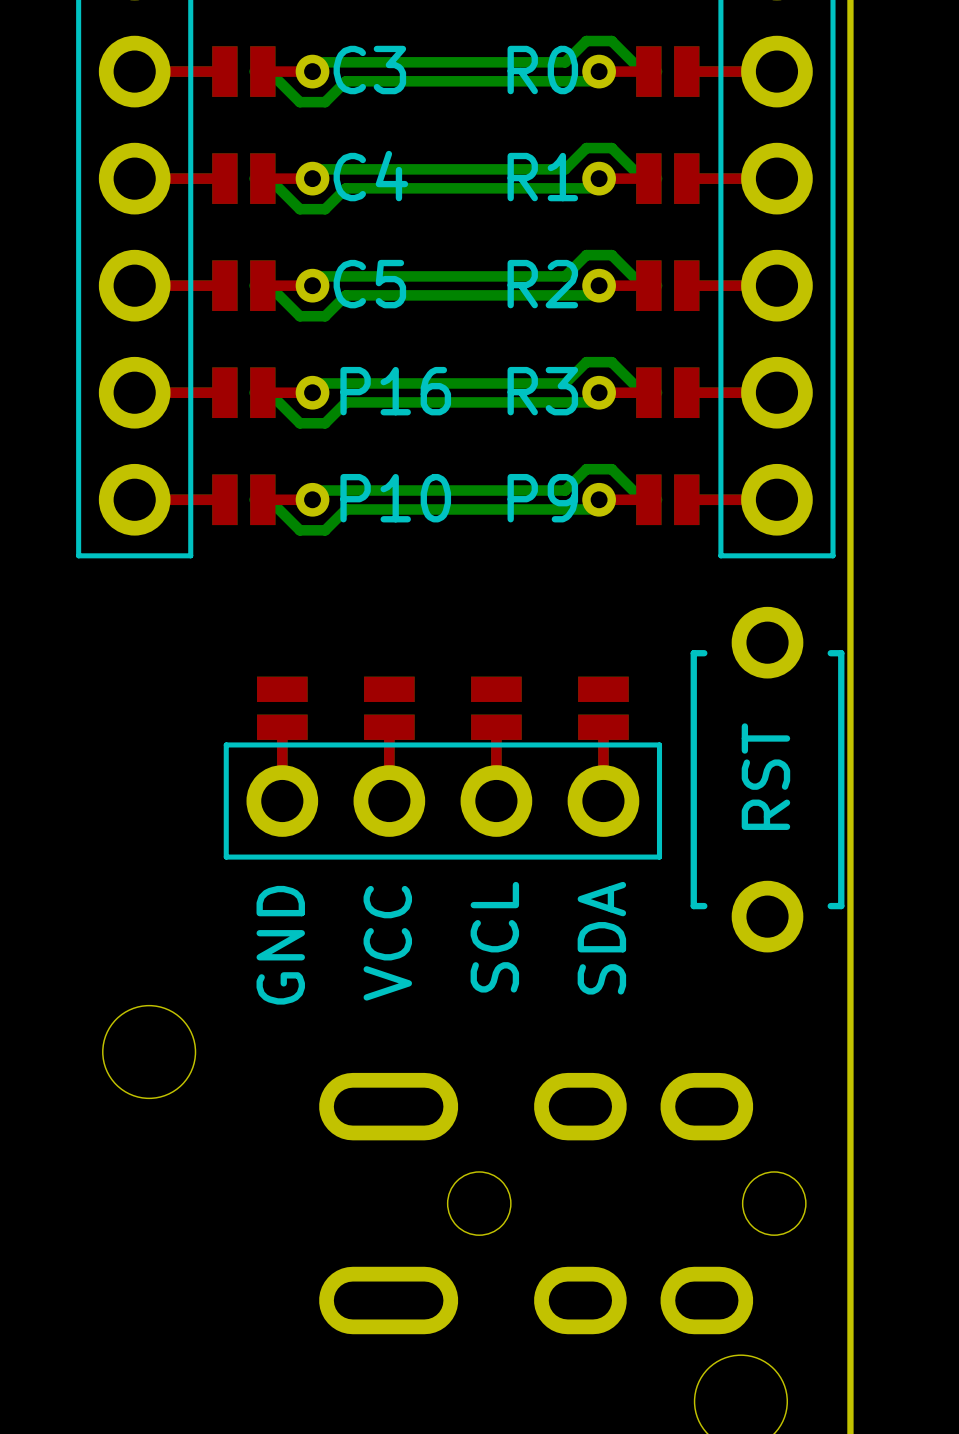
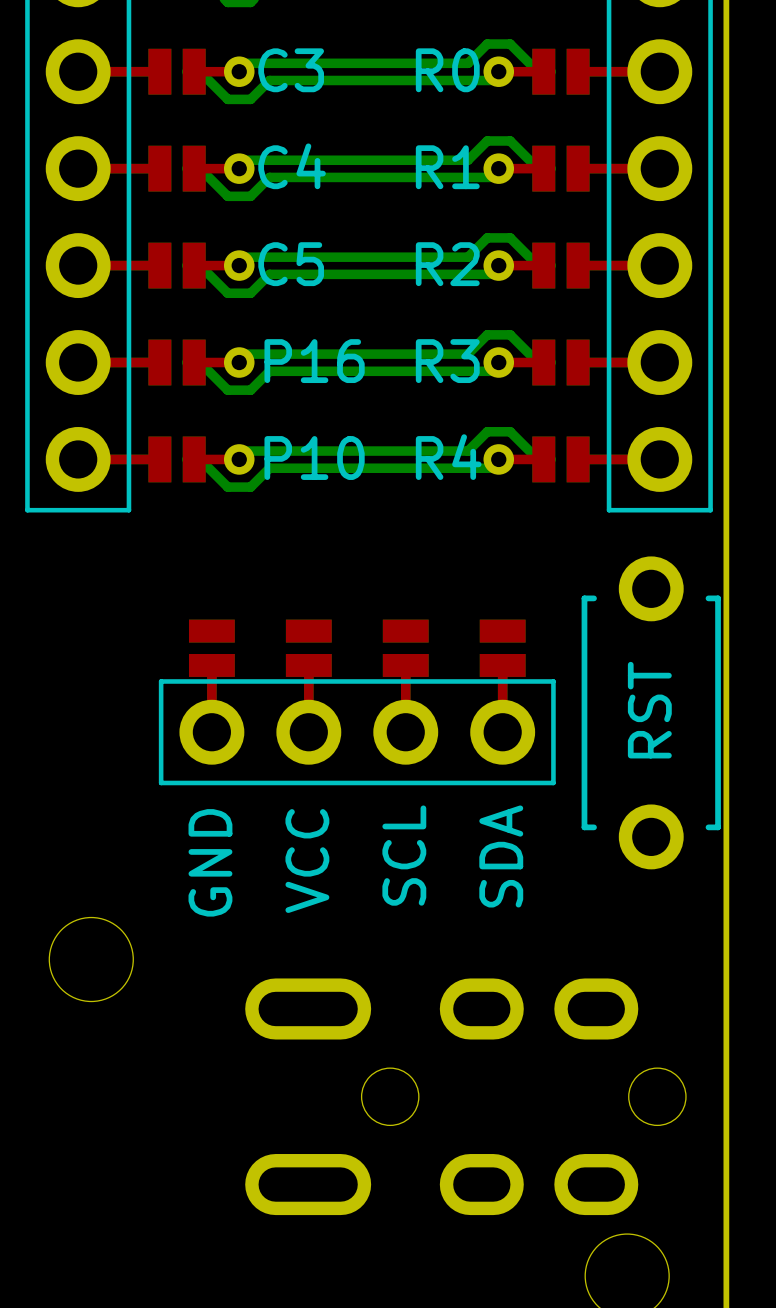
part text: P9 (542, 498) -> R4 (448, 457)

